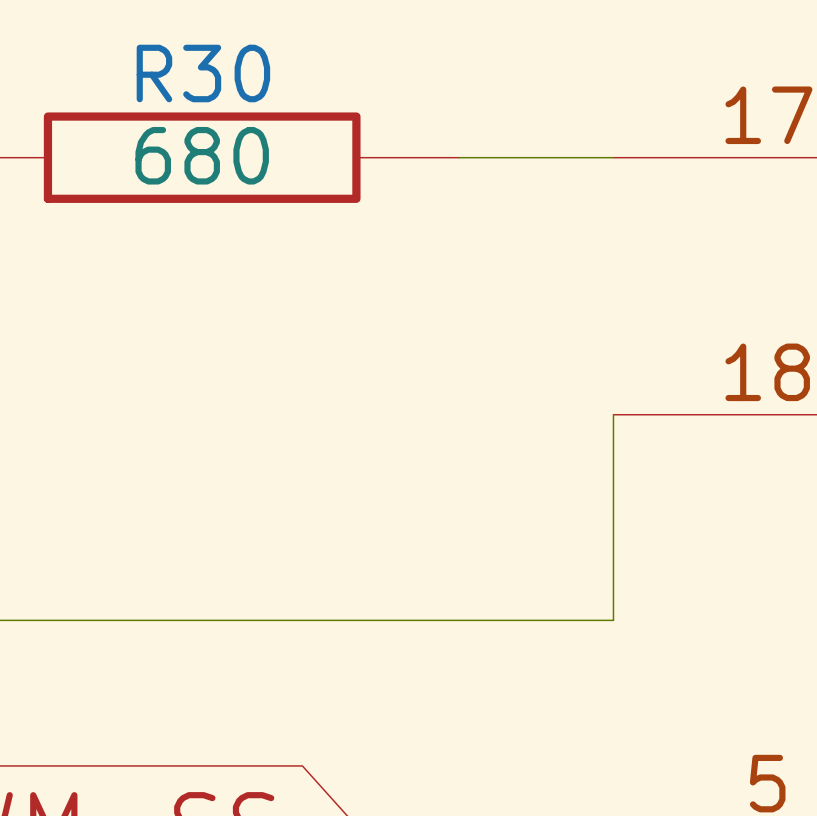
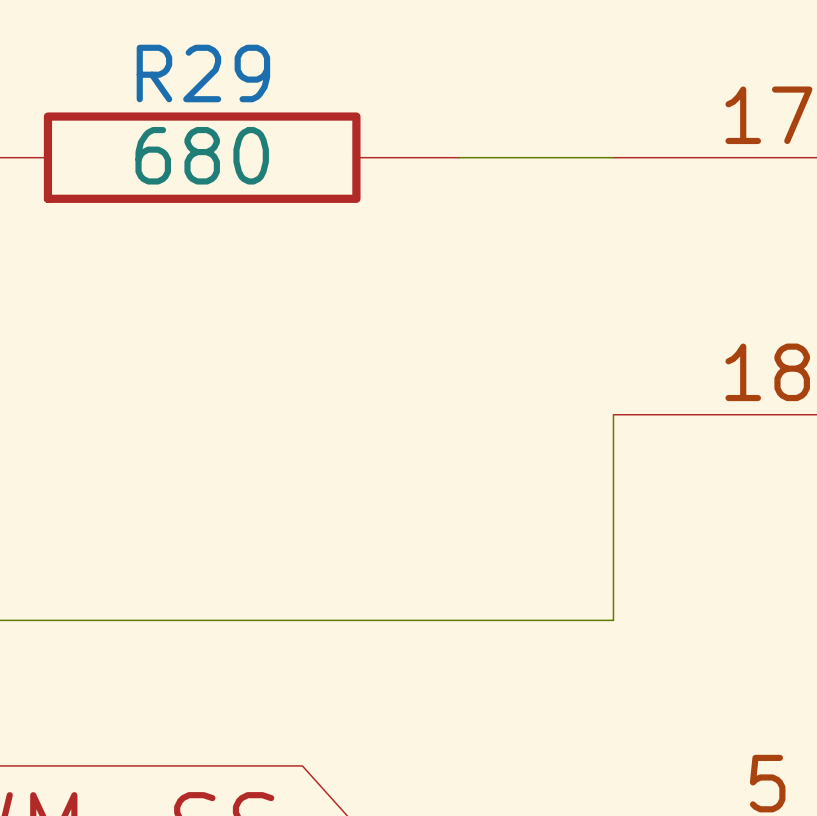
R30 name: R30 (203, 73) -> R29 (203, 73)

